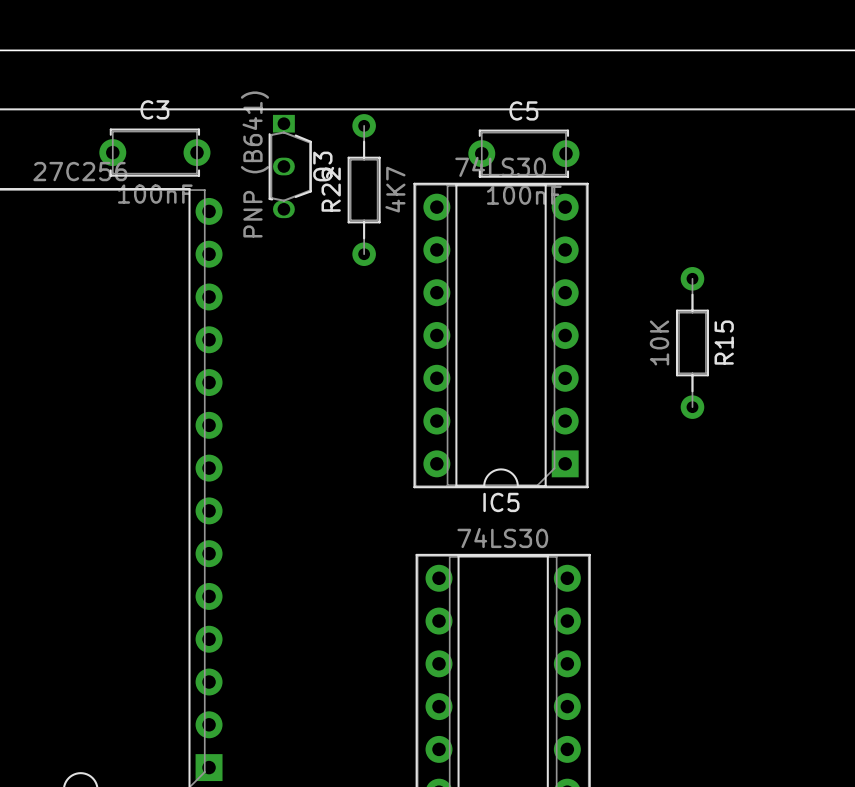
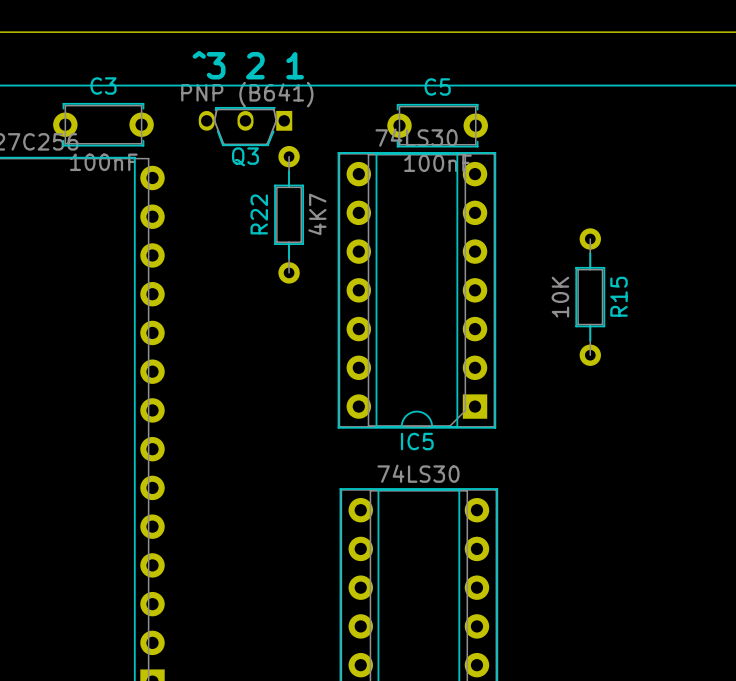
text: none -> ^3 2 1 (248, 65)
Q3 rotation: 0° (290, 166) -> 90° clockwise (245, 126)
R22 position: (364, 190) -> (289, 214)

